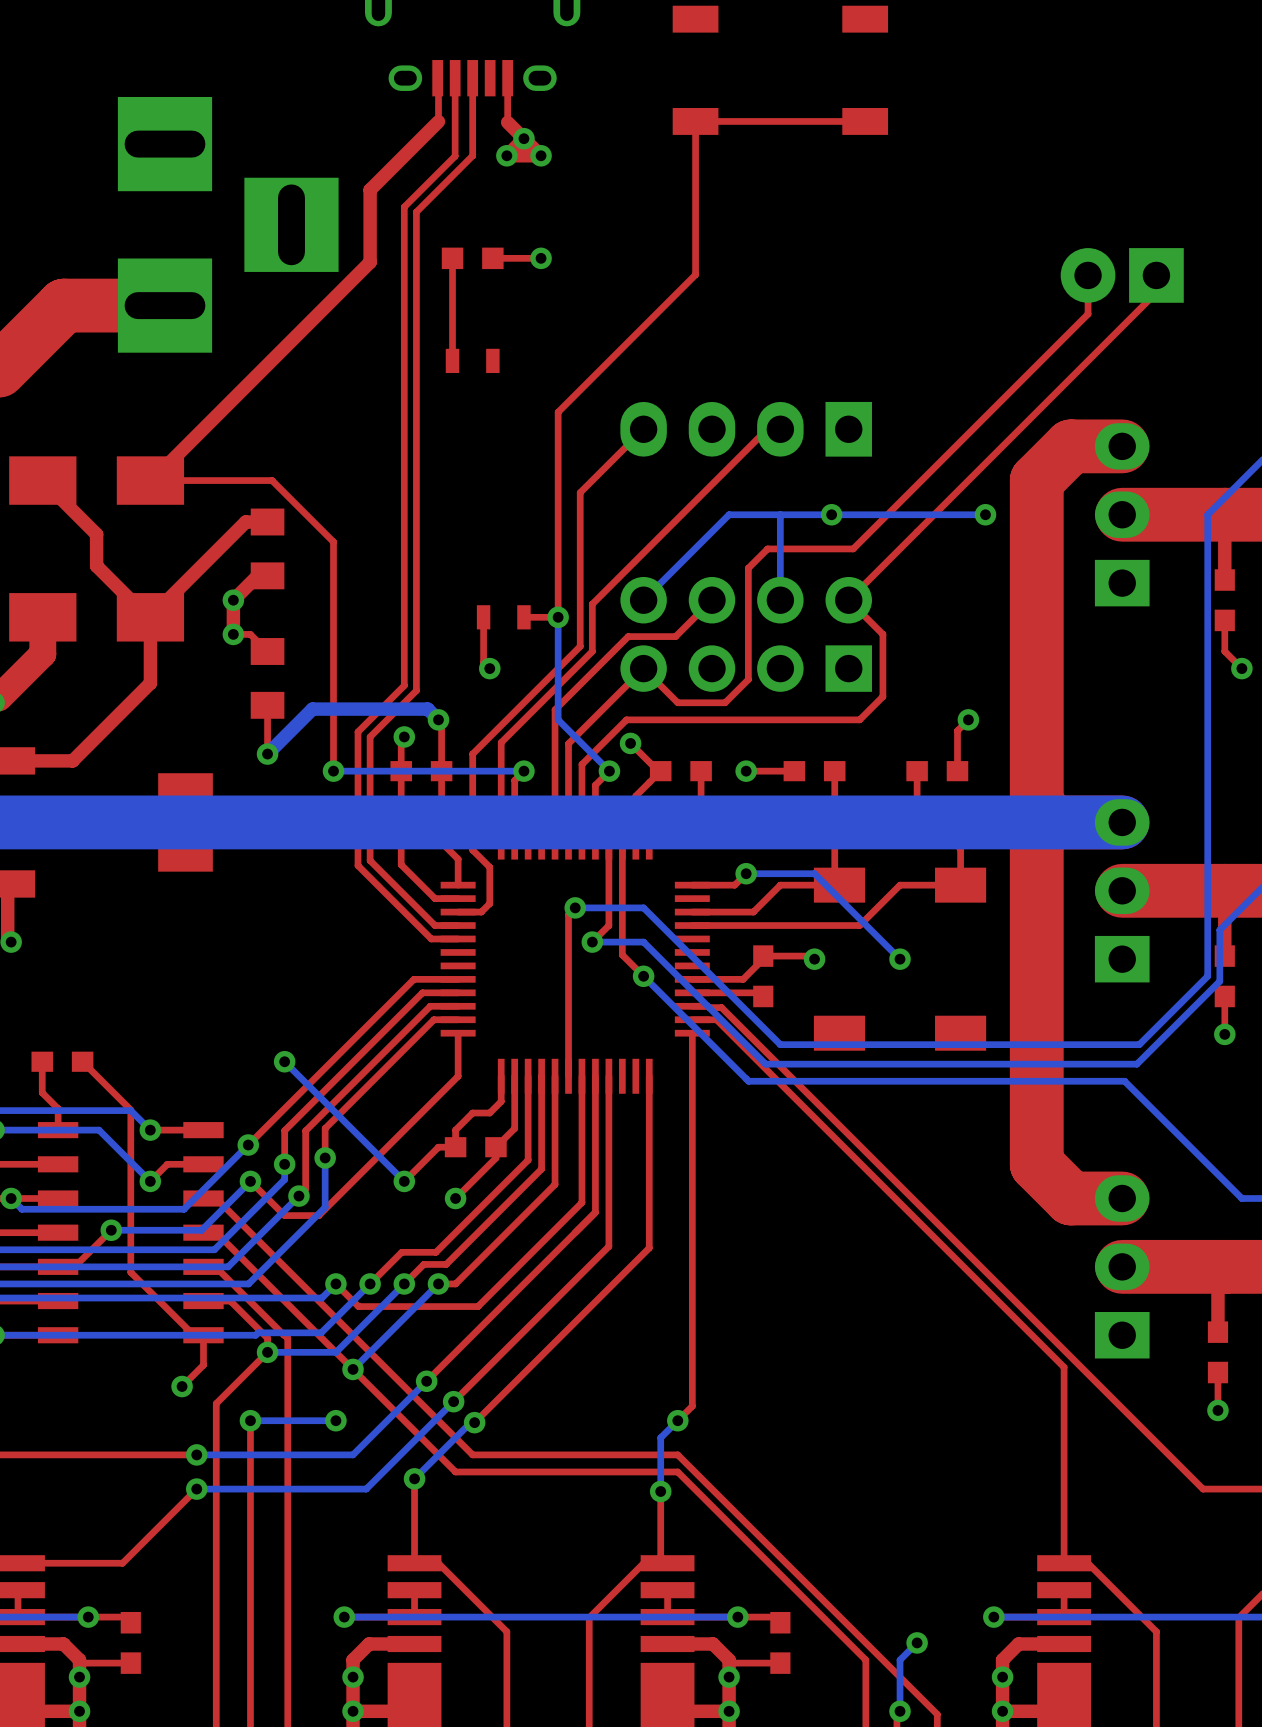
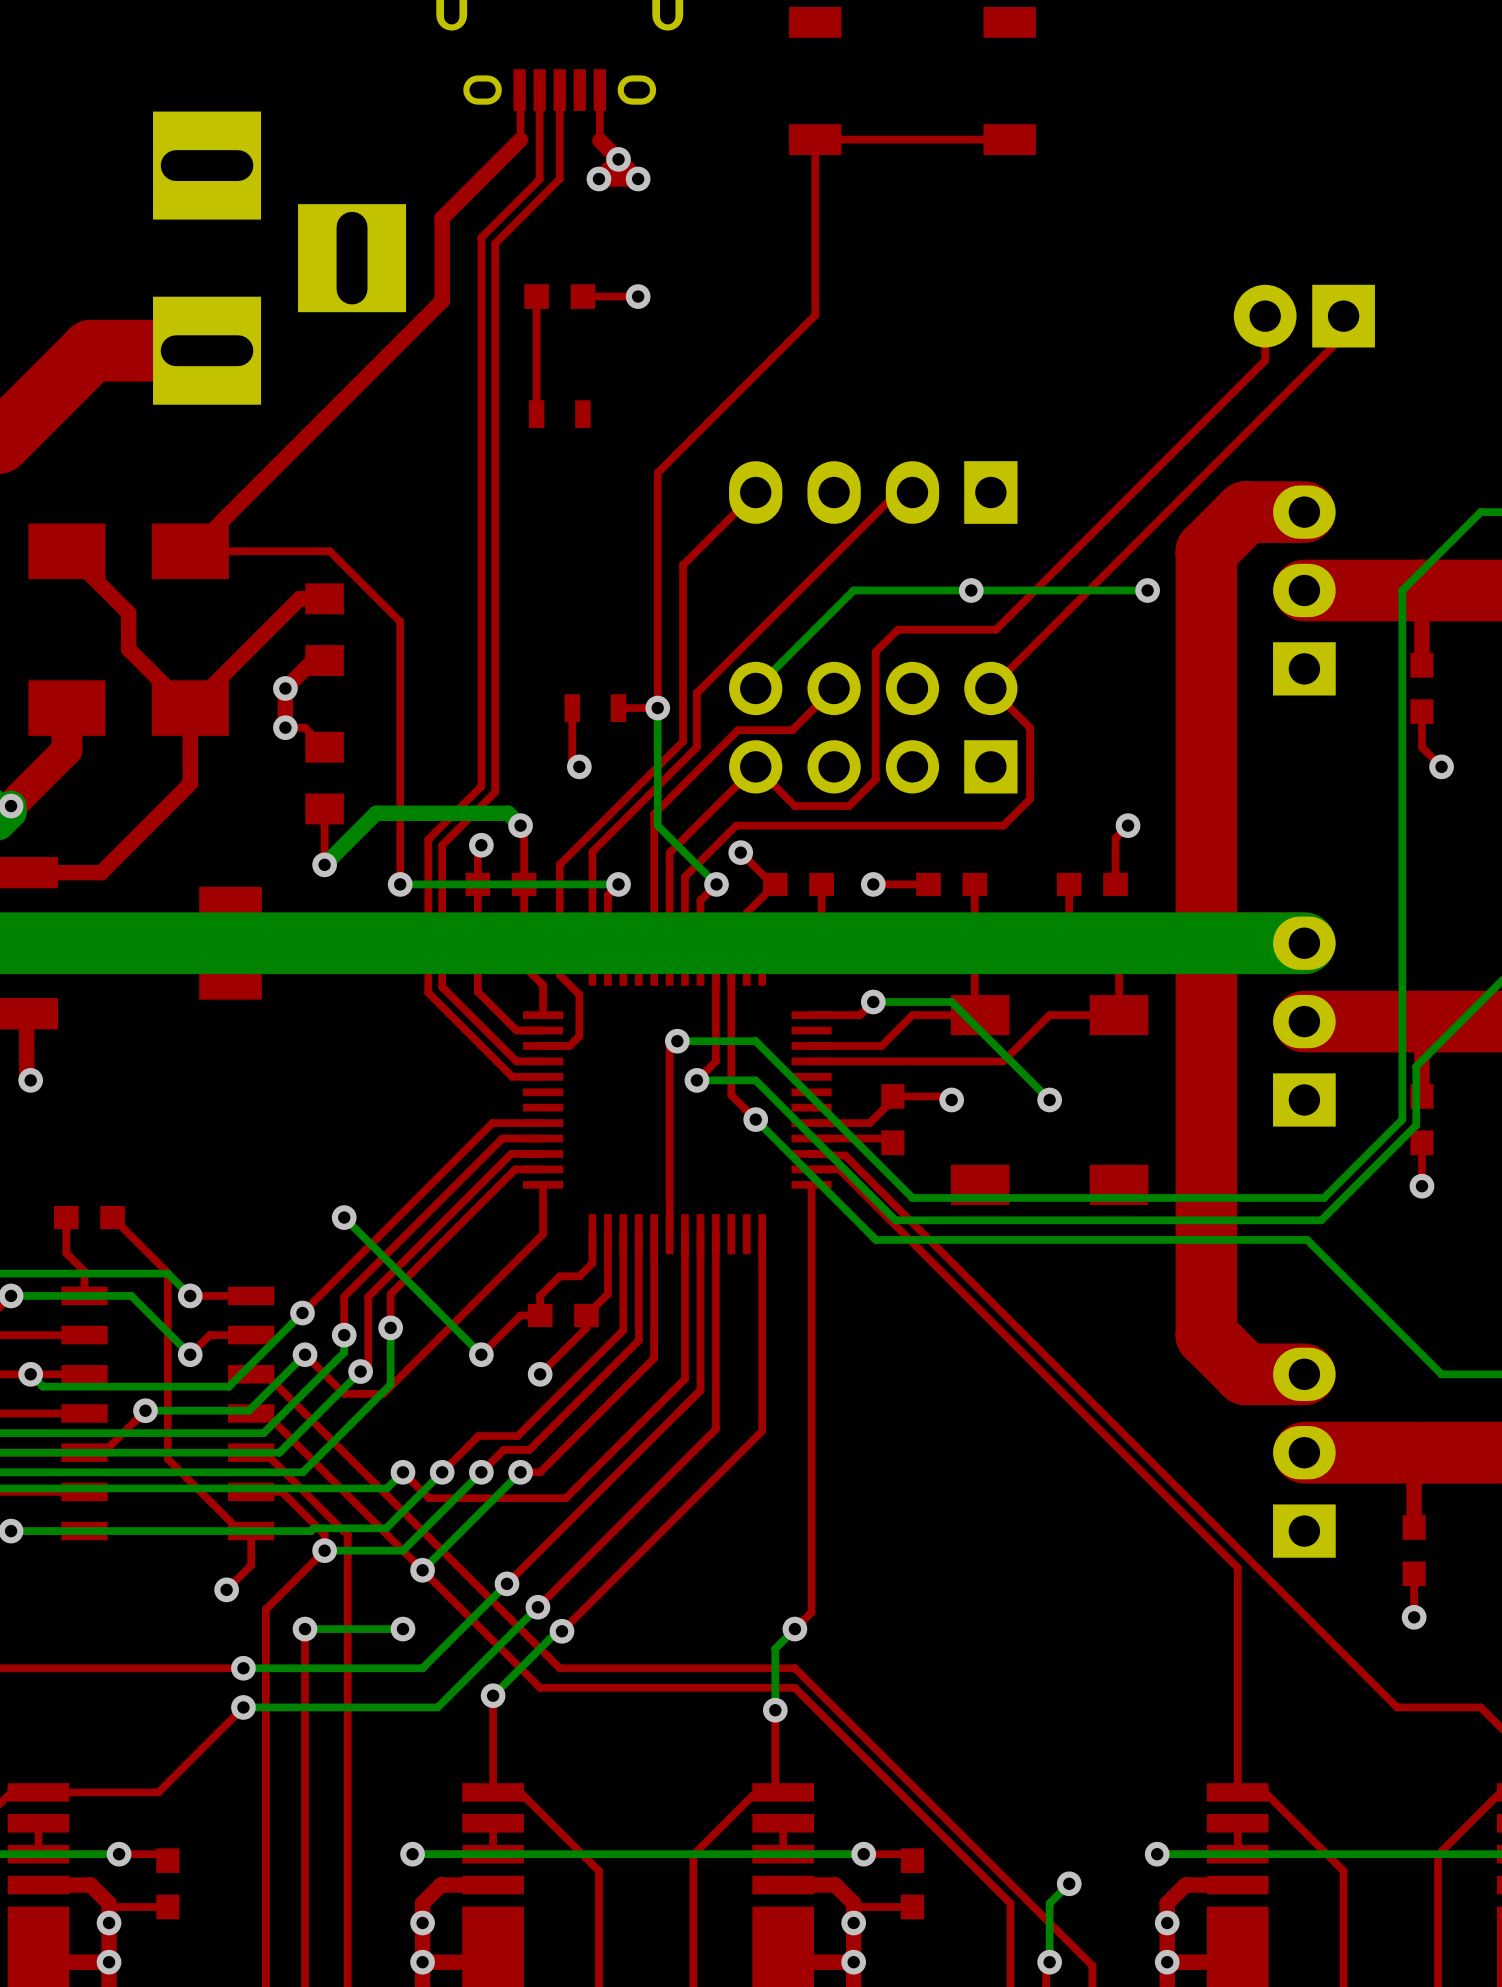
bottom track: (780, 514) (780, 600) -> none

